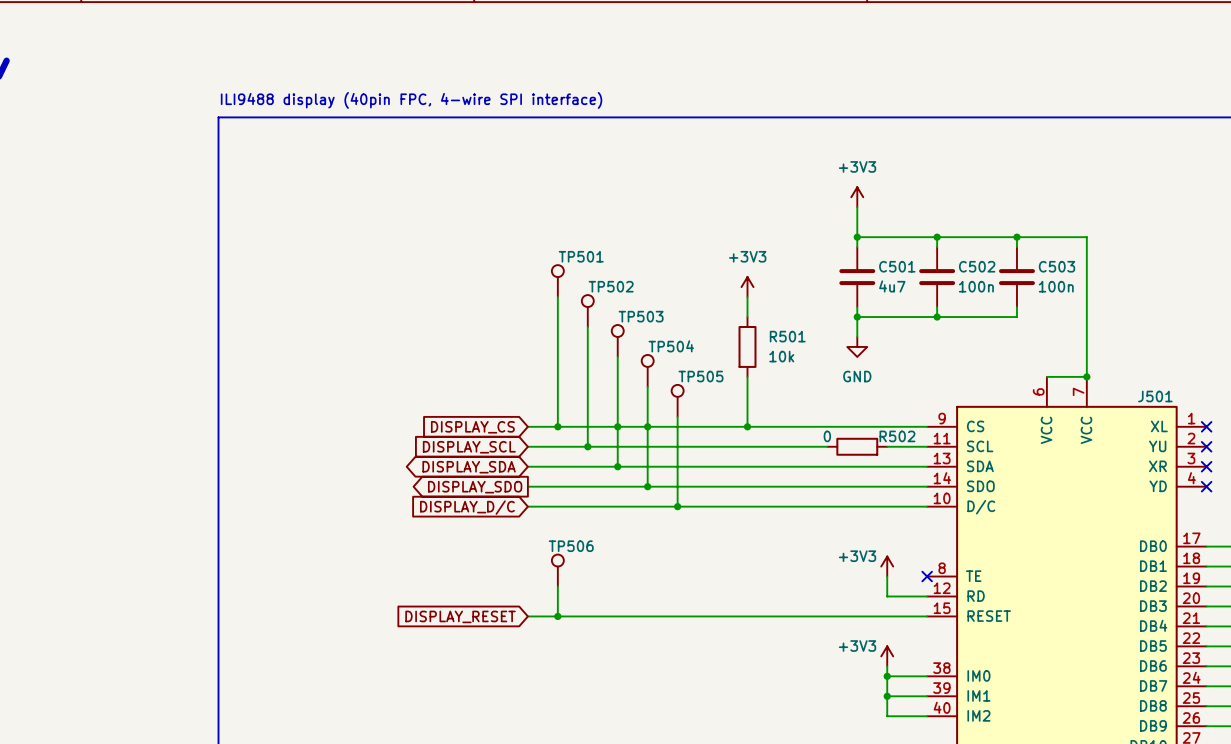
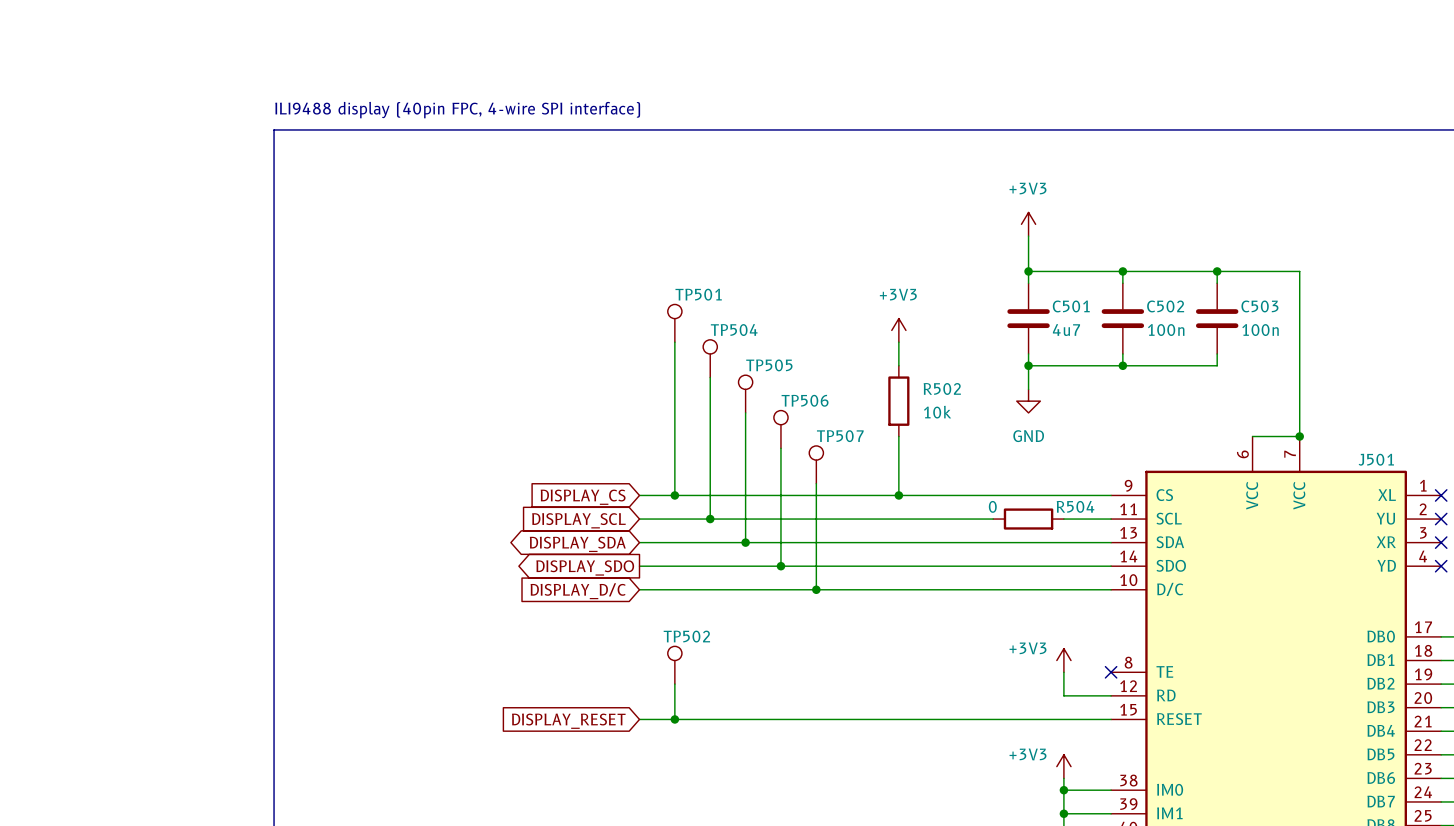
TP502 name: TP502 (611, 286) -> TP504 (734, 330)
TP503 name: TP503 (641, 316) -> TP505 (769, 365)
R501 name: R501 (787, 336) -> R502 (942, 388)
TP504 name: TP504 (671, 346) -> TP506 (805, 400)
TP505 name: TP505 (700, 376) -> TP507 (840, 436)
junction: (617, 426) -> none
junction: (647, 426) -> none
R502 name: R502 (897, 436) -> R504 (1075, 506)
TP506 name: TP506 (571, 546) -> TP502 (686, 636)

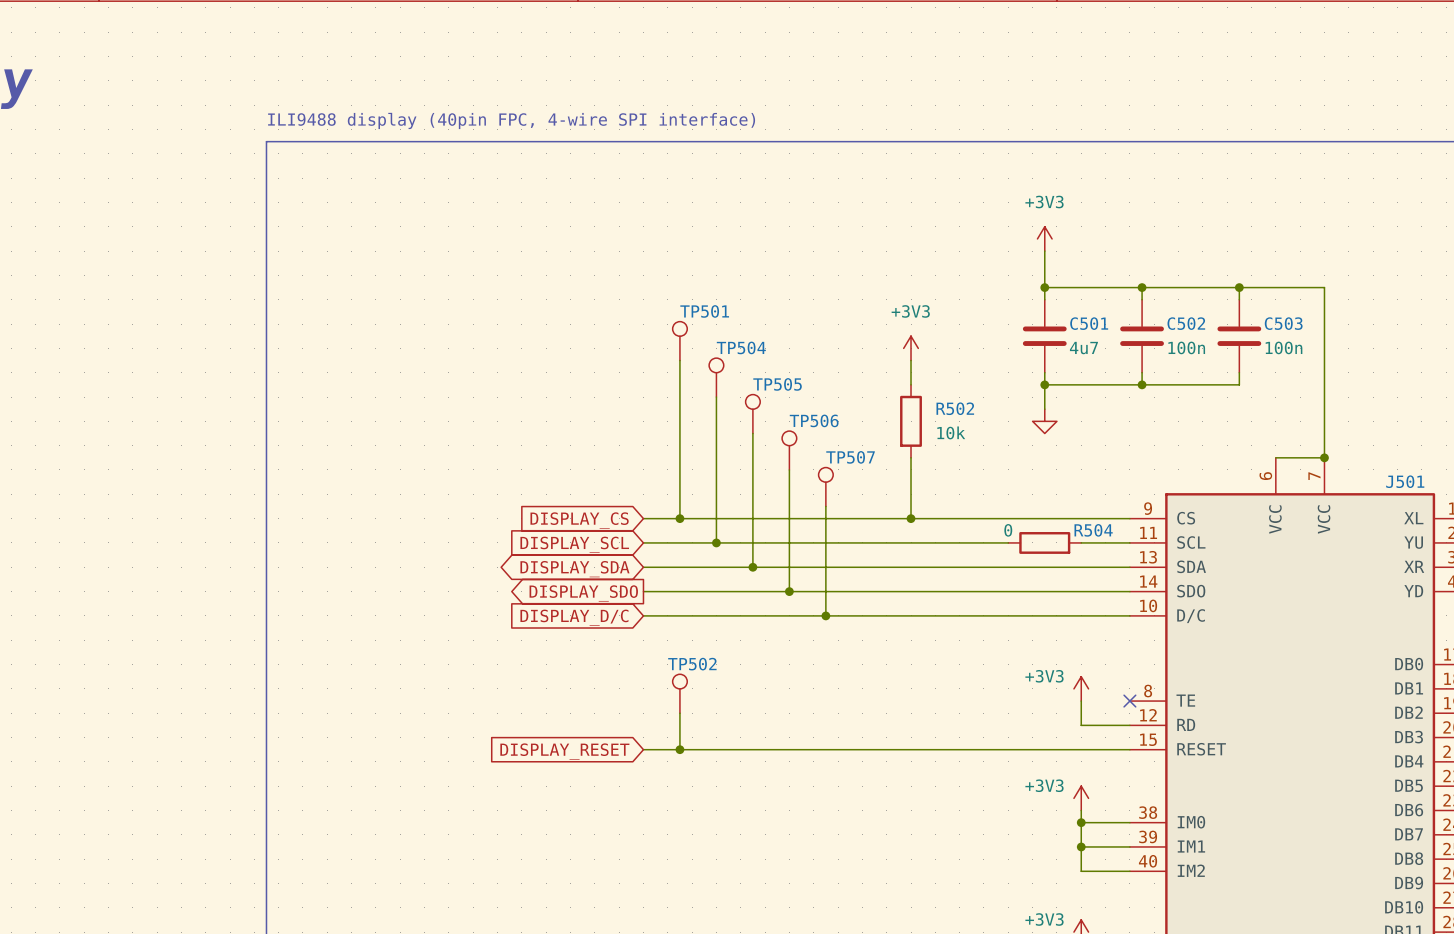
power symbol text: GND (1028, 436) -> none

